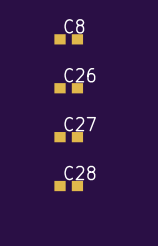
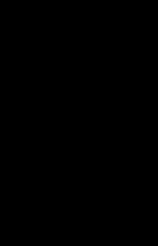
C8: (68, 39) -> none
C26: (68, 88) -> none
C27: (68, 137) -> none
C28: (68, 186) -> none

